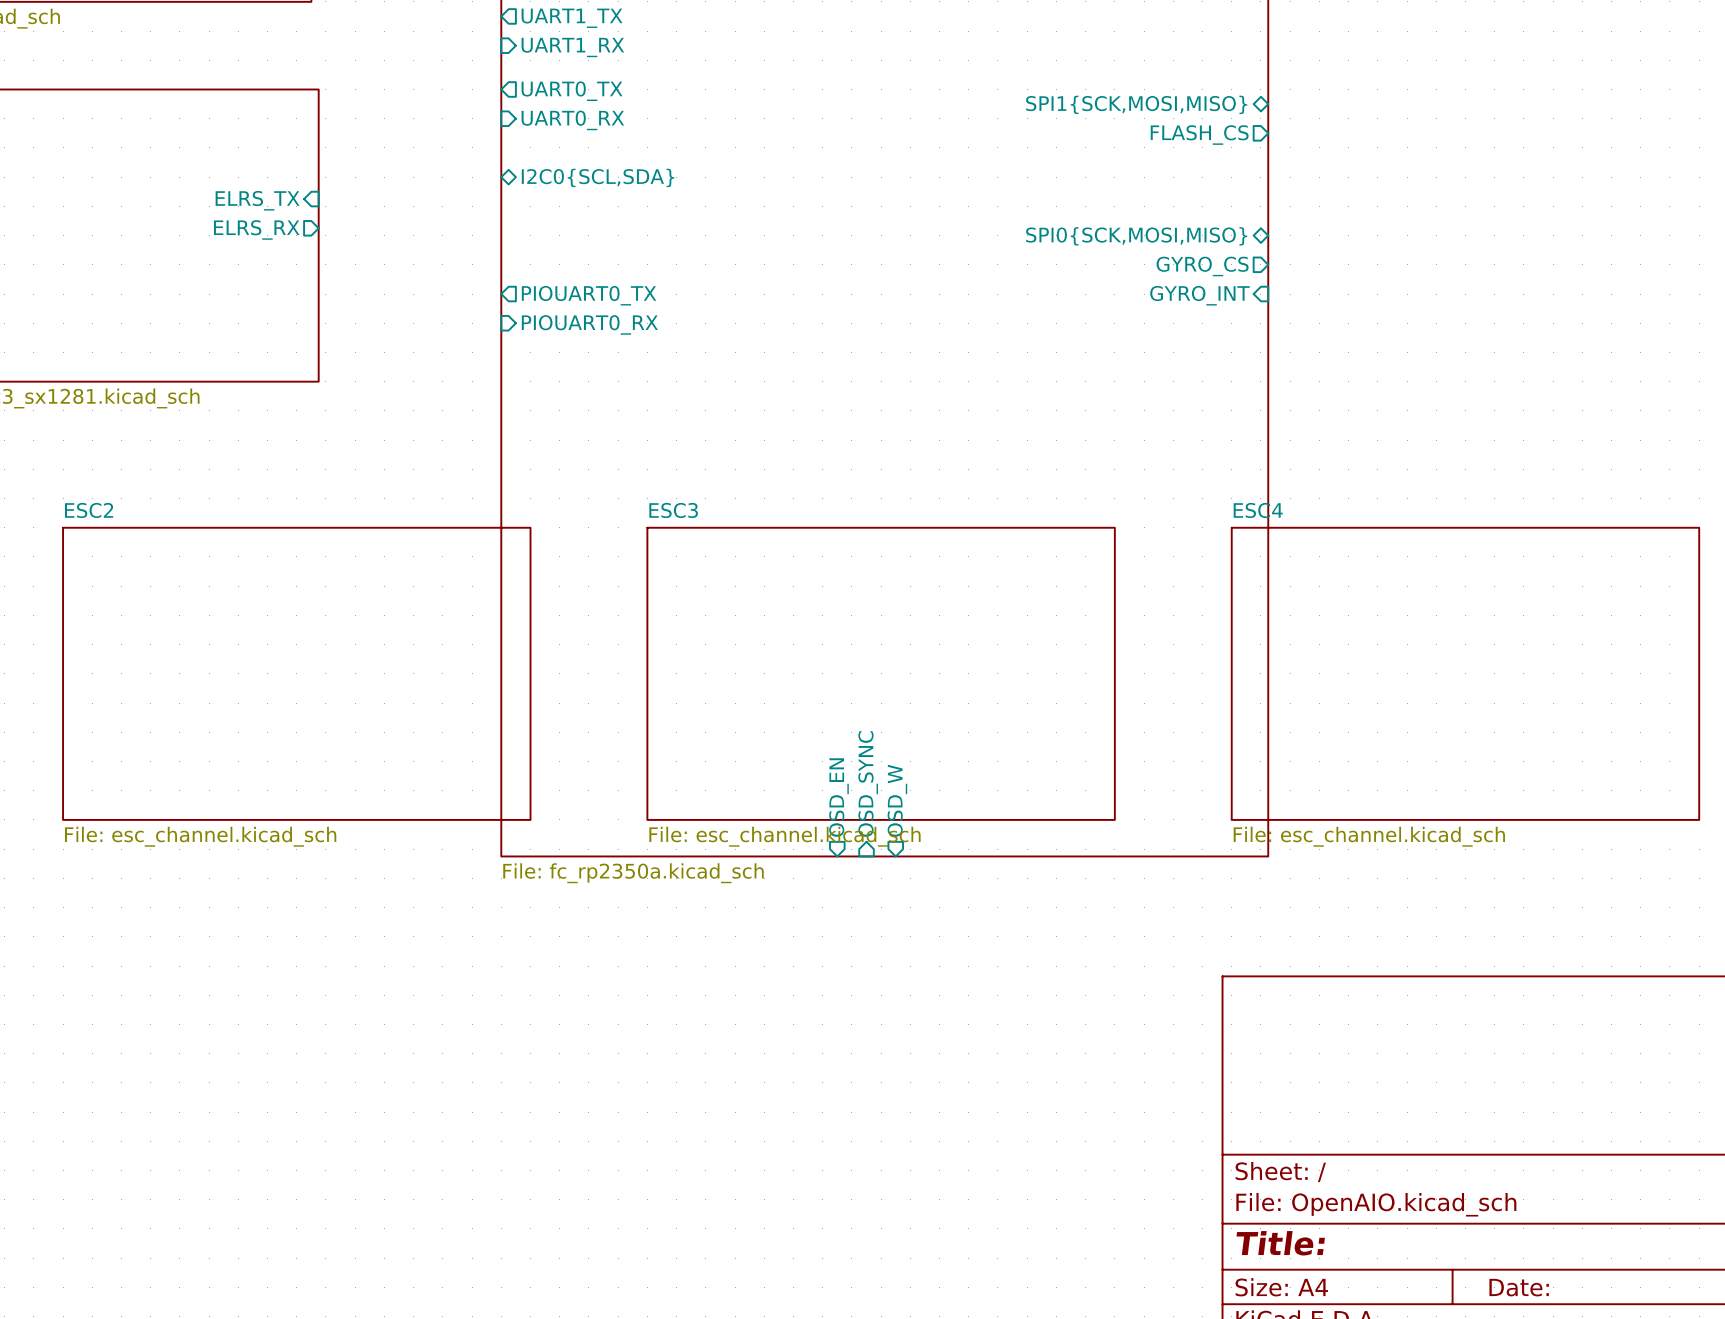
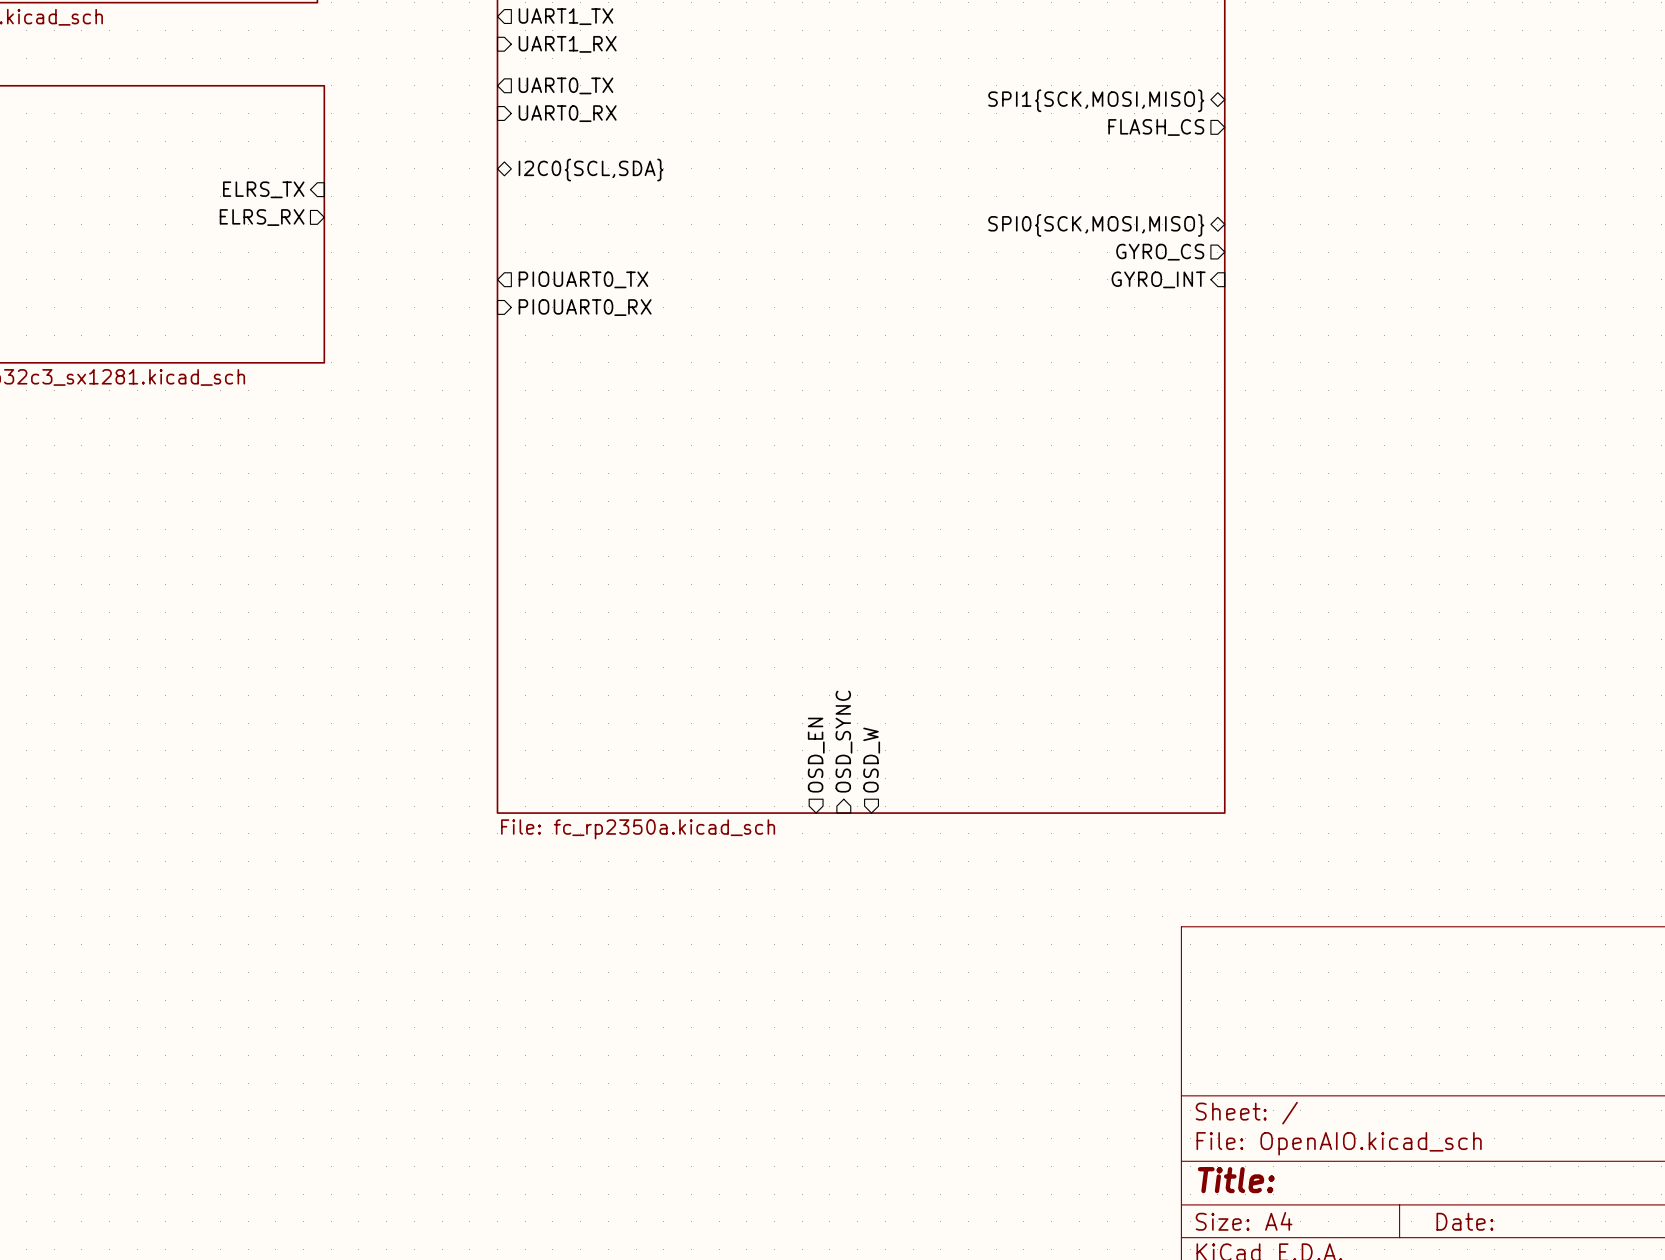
sheet ESC2: File: esc_channel.kicad_sch (296, 673) -> none
sheet ESC3: File: esc_channel.kicad_sch (881, 673) -> none
sheet ESC4: File: esc_channel.kicad_sch (1465, 673) -> none

